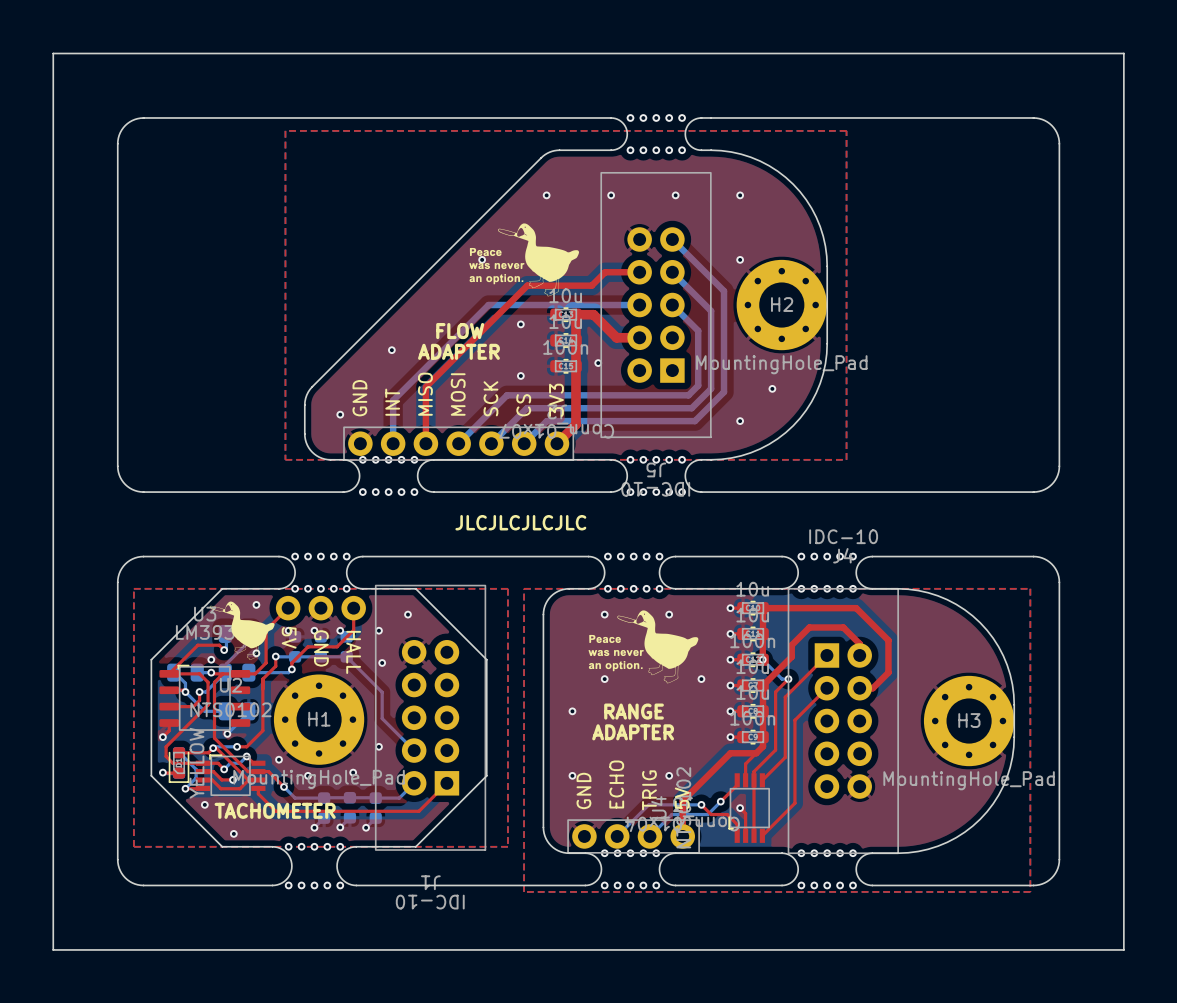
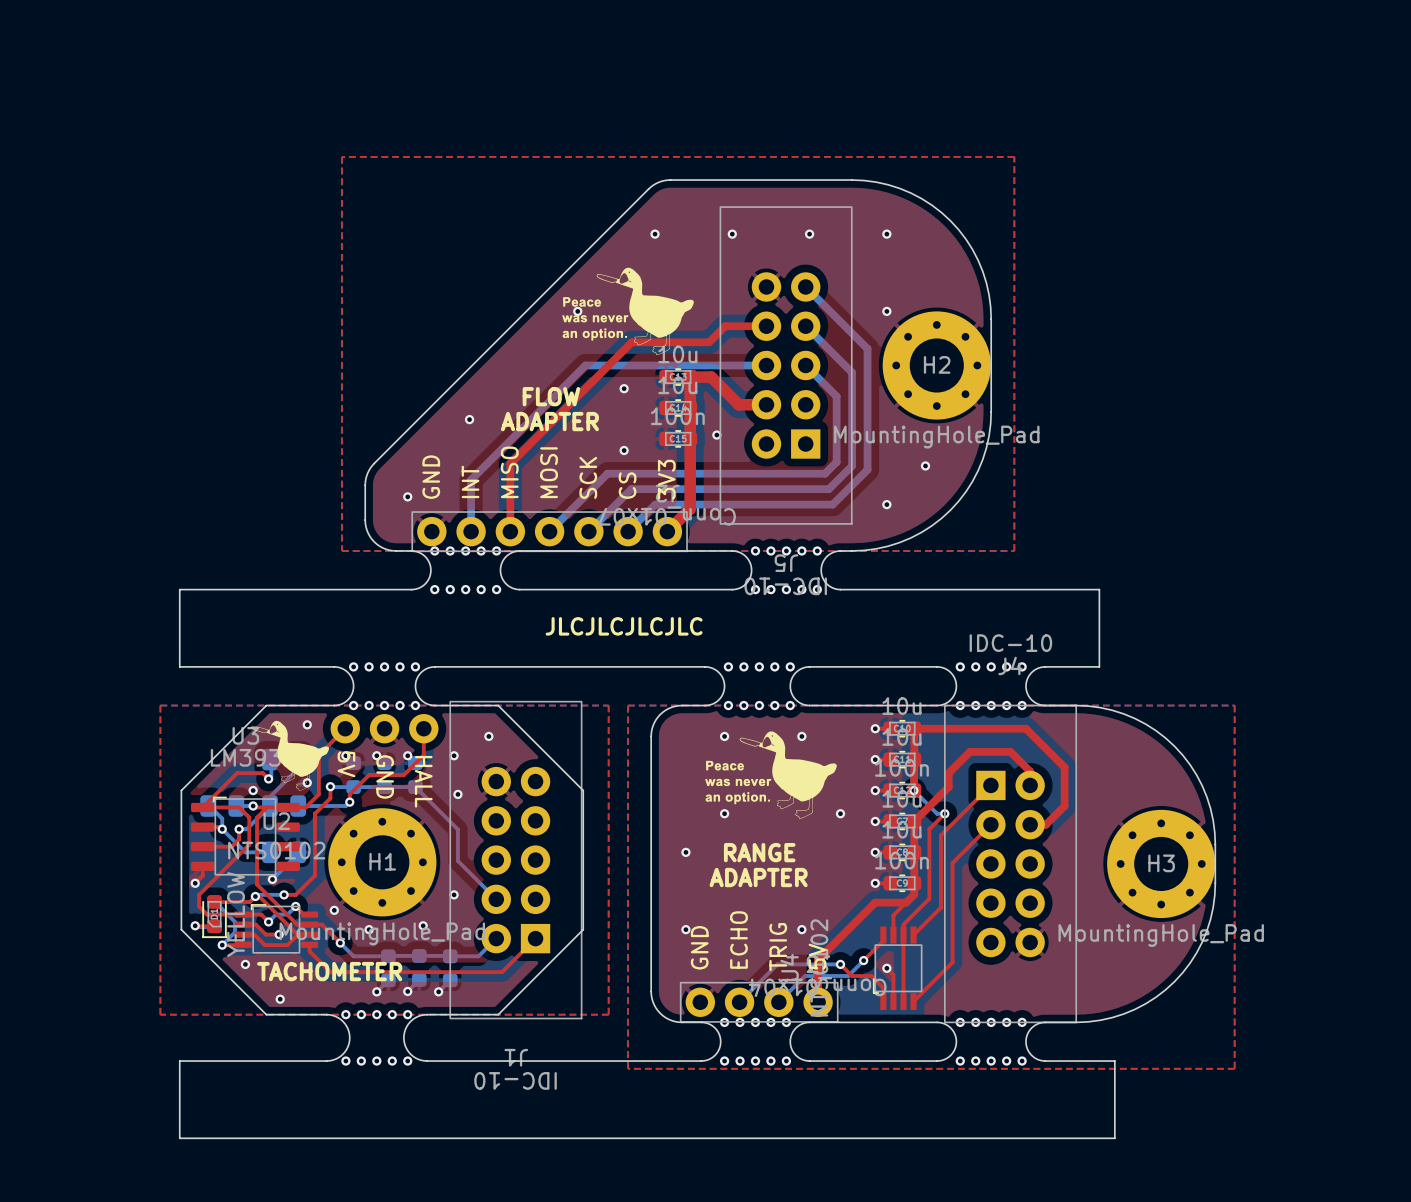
via: (630, 117) -> none
via: (643, 117) -> none
via: (656, 117) -> none
via: (669, 117) -> none
via: (682, 117) -> none
board edge: (611, 150) (622, 145) (627, 134) (622, 122) (611, 117) (143, 117) (127, 123) (120, 132) (117, 143) (117, 469) (121, 479) (127, 486) (137, 491) (150, 492) -> none
via: (630, 150) -> none
via: (643, 150) -> none
via: (656, 150) -> none
via: (669, 150) -> none
via: (682, 150) -> none
board edge: (701, 150) (690, 145) (685, 134) (690, 122) (701, 117) (1033, 117) (1047, 121) (1055, 130) (1059, 143) (1057, 474) (1049, 486) (1036, 491) (917, 492) -> (840, 180) (732, 180)
board edge: (150, 556) (137, 557) (127, 562) (120, 571) (117, 582) (117, 862) (121, 873) (127, 879) (137, 884) (150, 885) -> (179, 666) (179, 589)
board edge: (917, 556) (1039, 557) (1053, 566) (1059, 582) (1059, 859) (1056, 870) (1047, 881) (1036, 885) (930, 885) -> (1099, 666) (1099, 589)
board edge: none -> (1114, 1061) (1114, 1138)
board edge: (150, 949) (53, 949) (53, 53) (1123, 53) (1123, 949) (930, 949) -> (179, 1138) (179, 1061)

